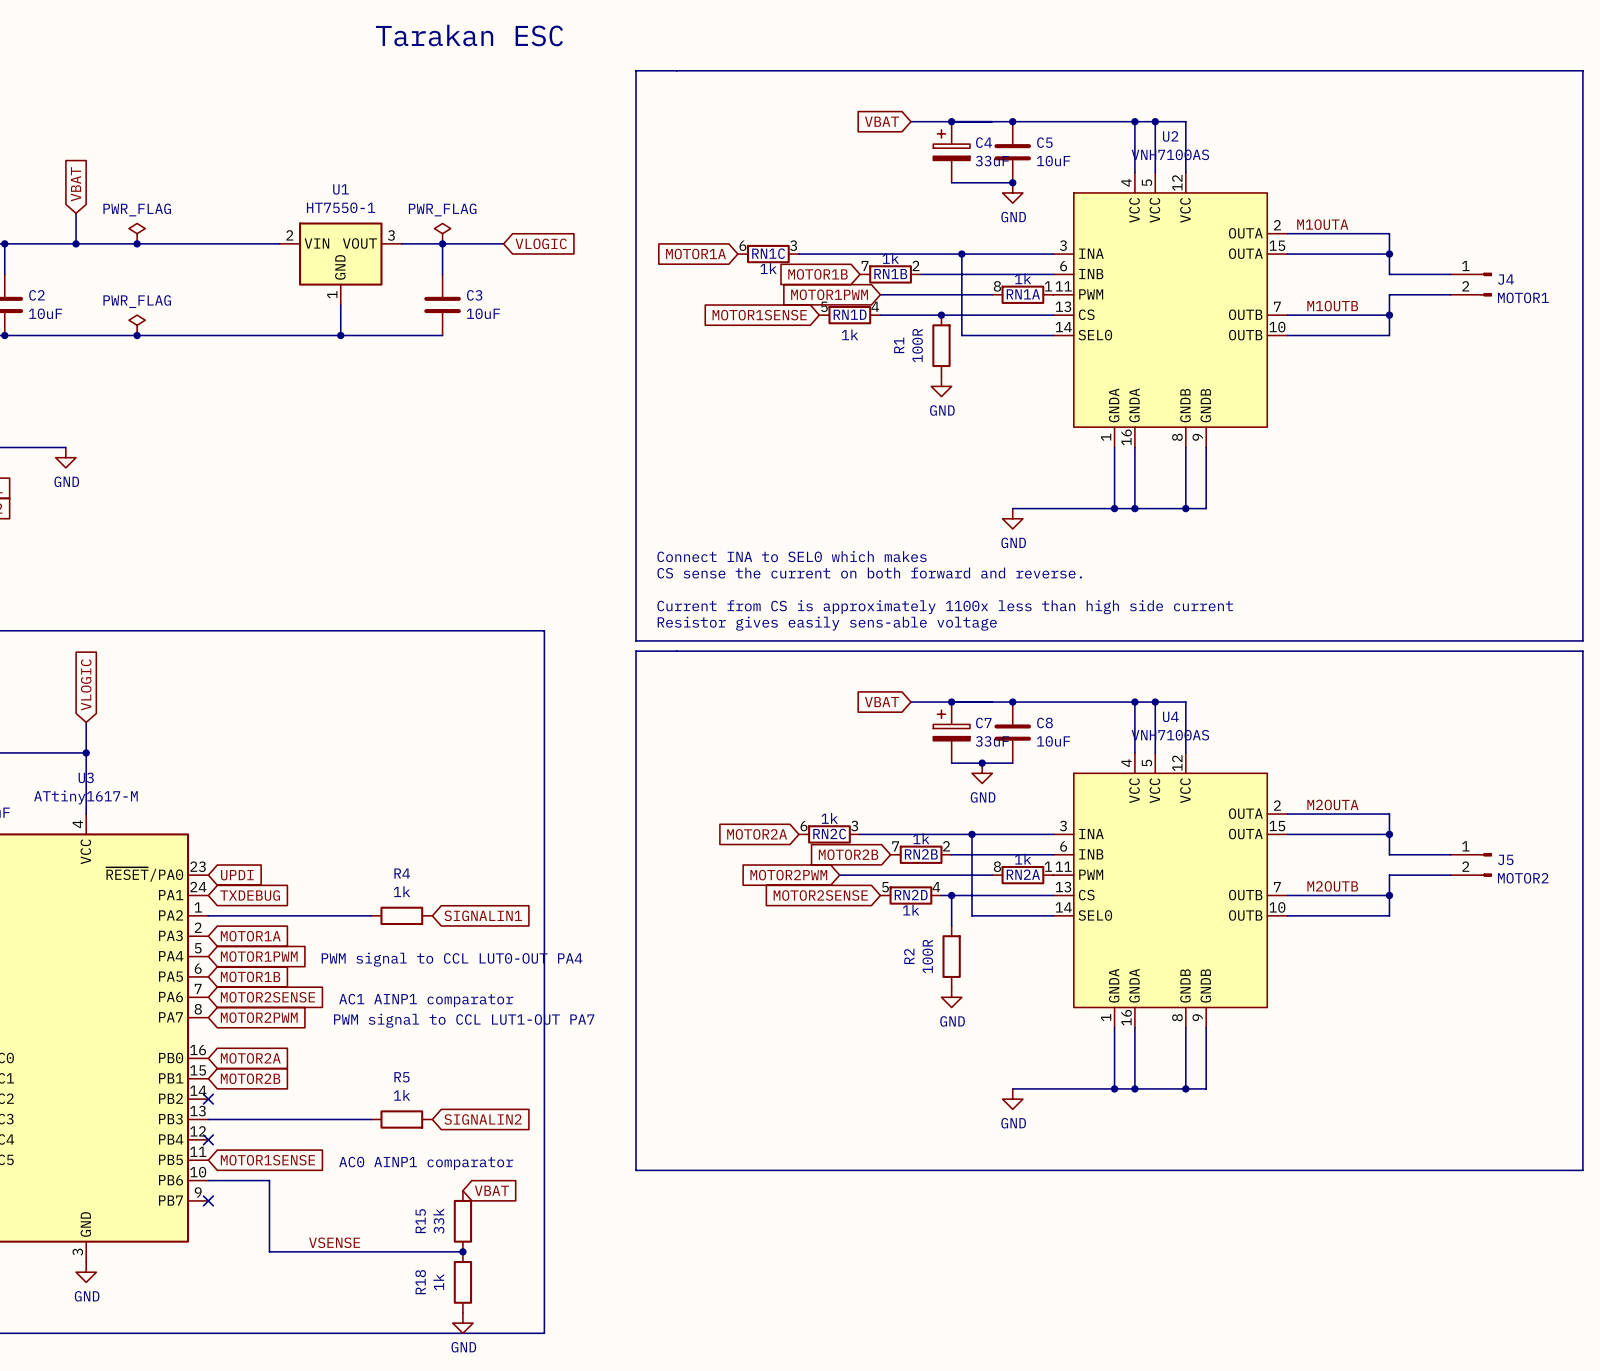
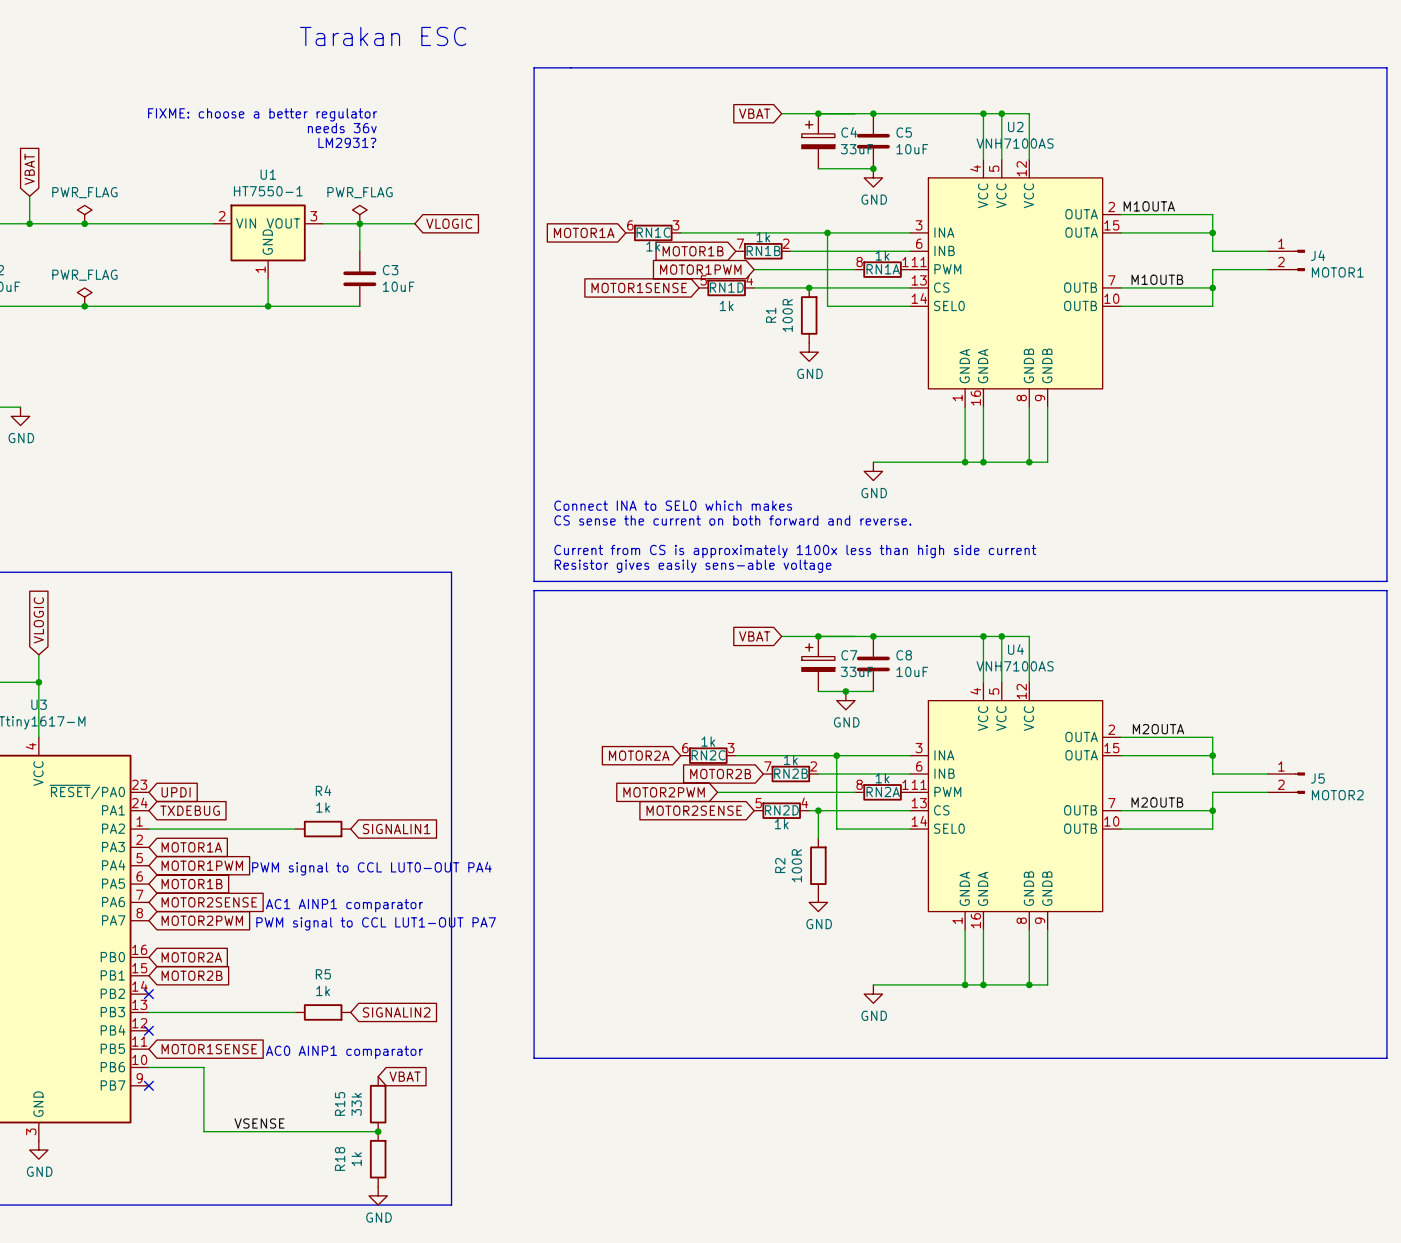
text: none -> FIXME: choose a better regulator (262, 114)
text: none -> needs 36v (342, 128)
text: none -> LM2931? (347, 142)

